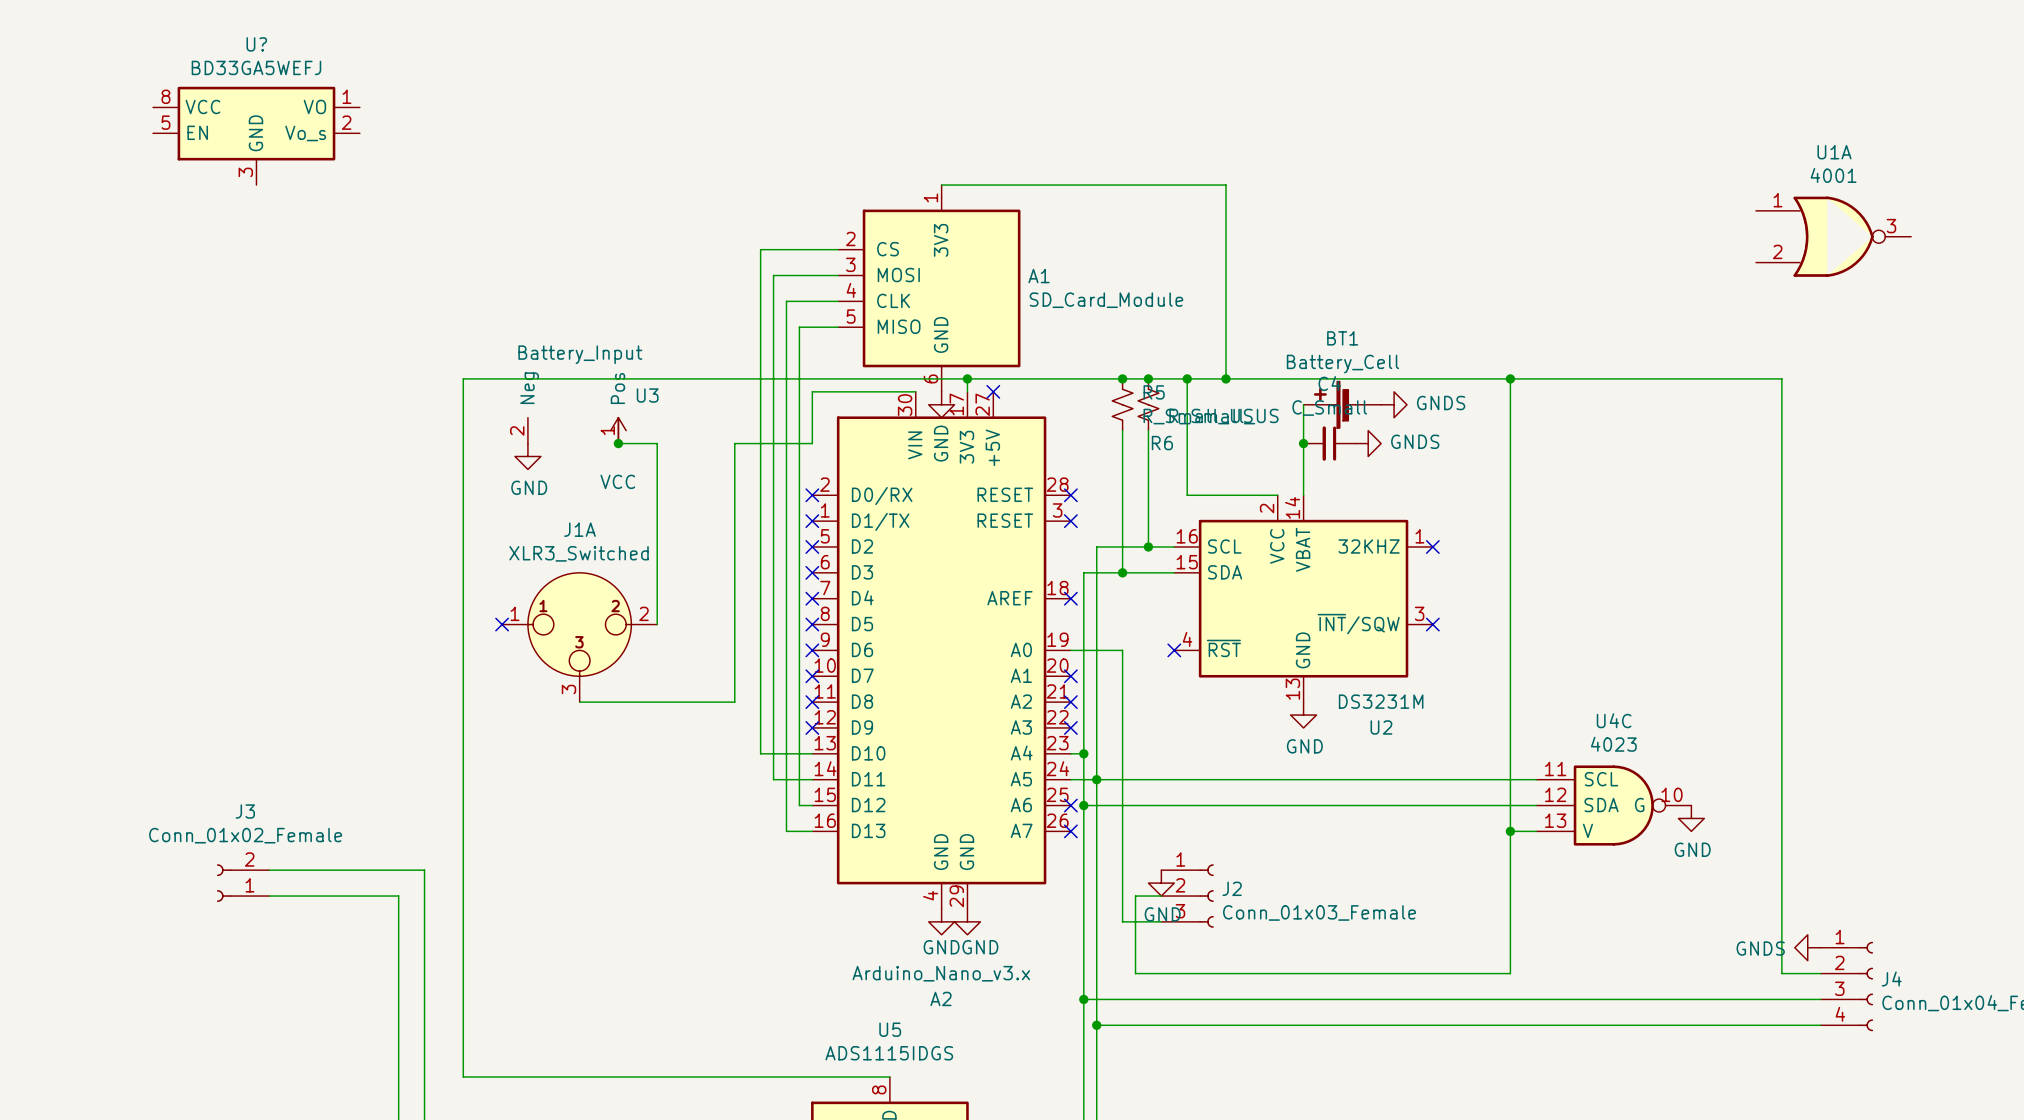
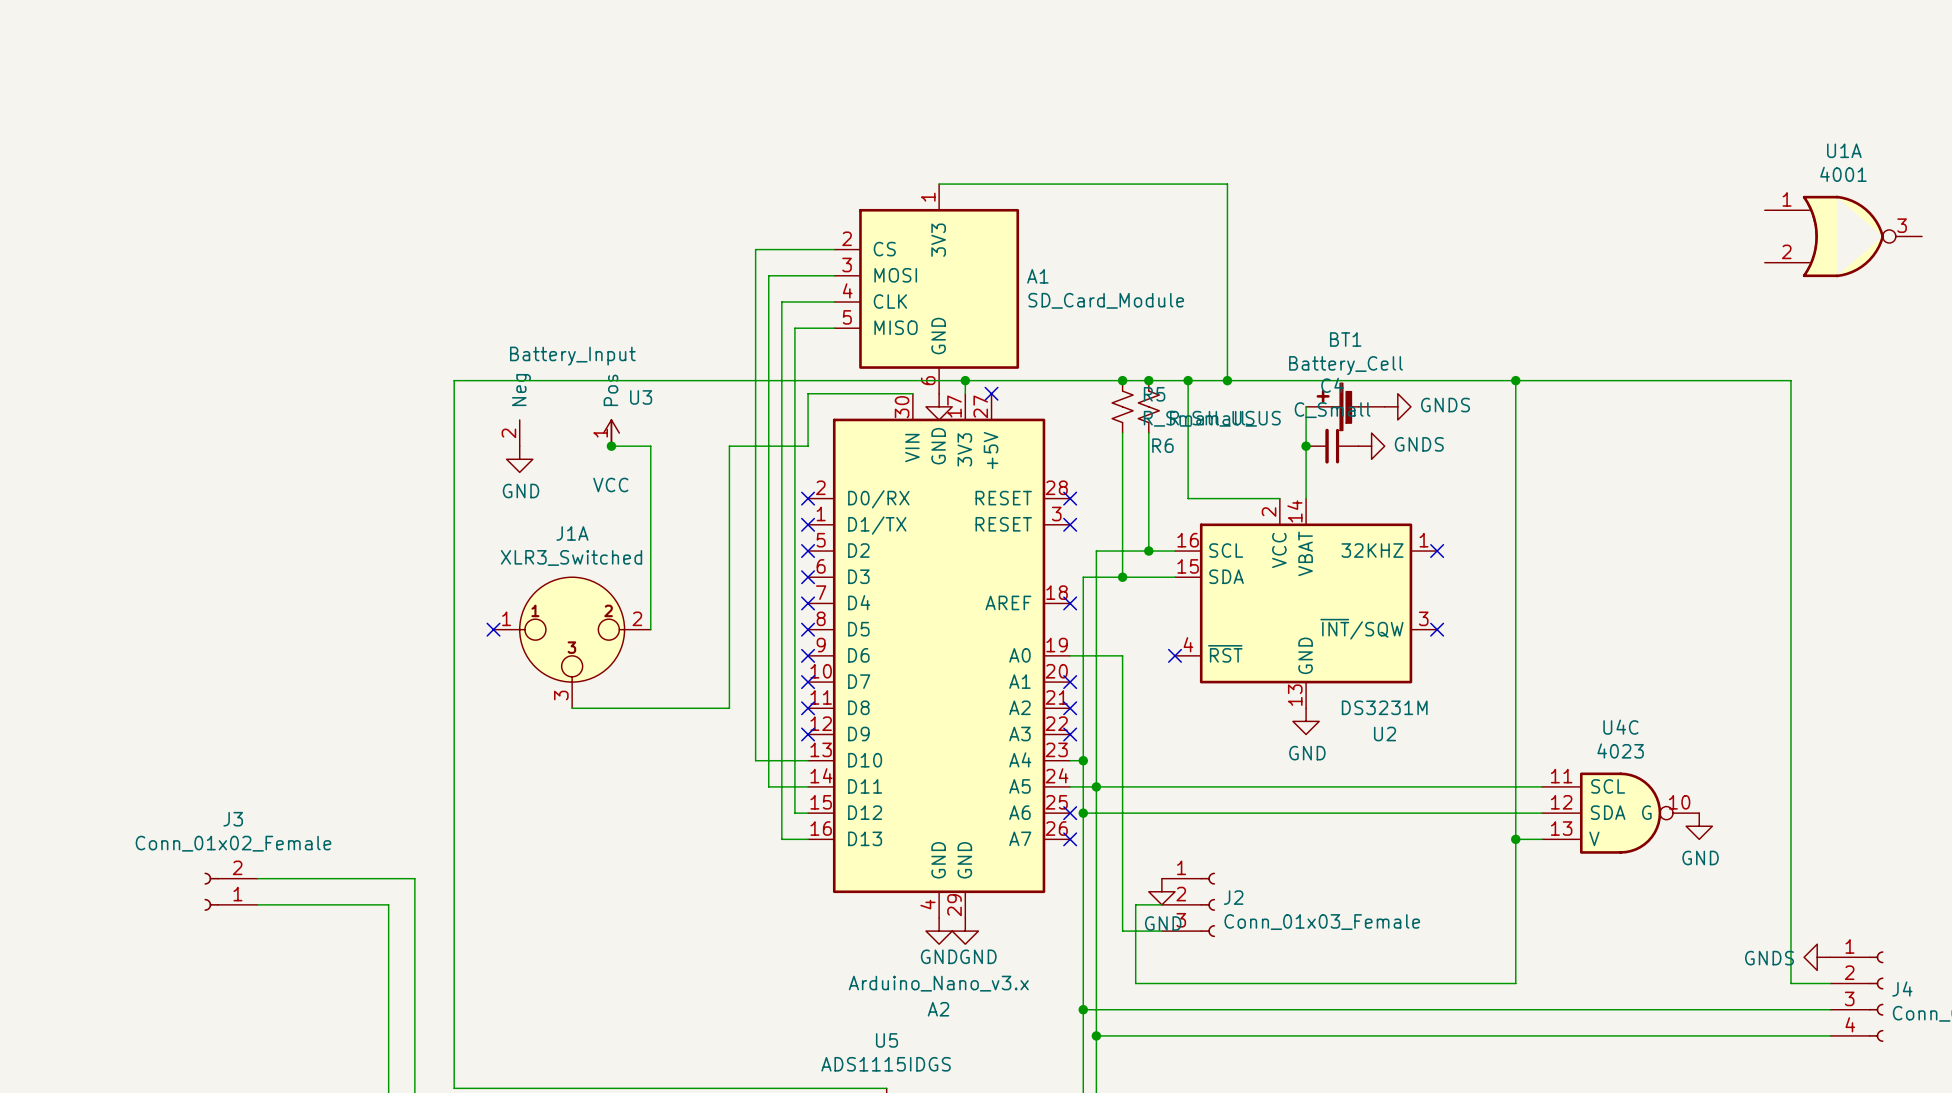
U?: BD33GA5WEFJ (256, 135) -> none

